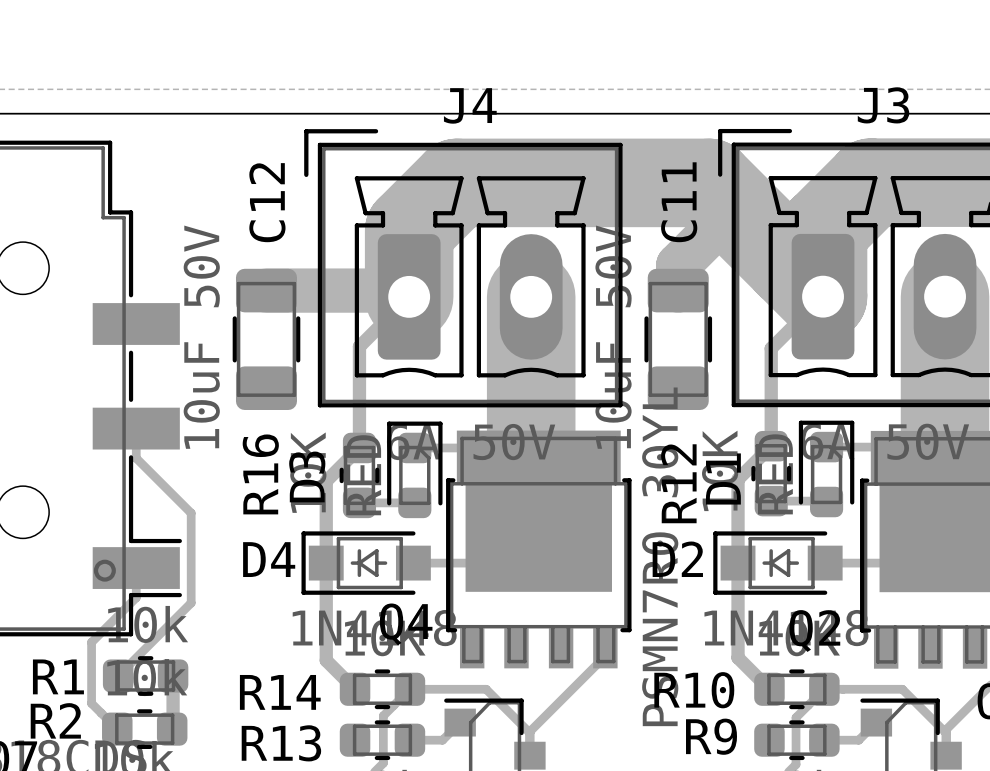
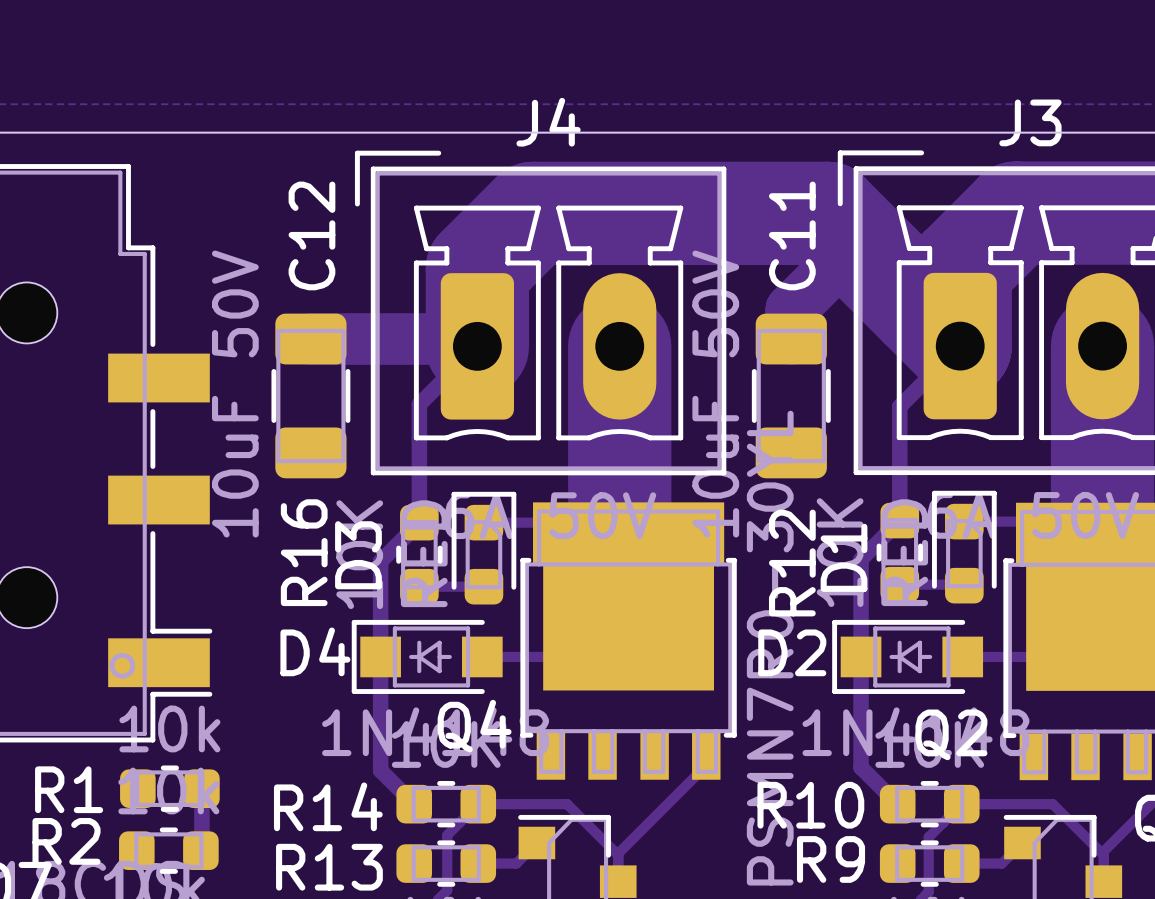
track: (136, 428) (136, 458) (191, 513) (191, 602) (118, 675) -> none
track: (136, 568) (136, 597) (91, 642) (91, 703) (117, 729) -> none

